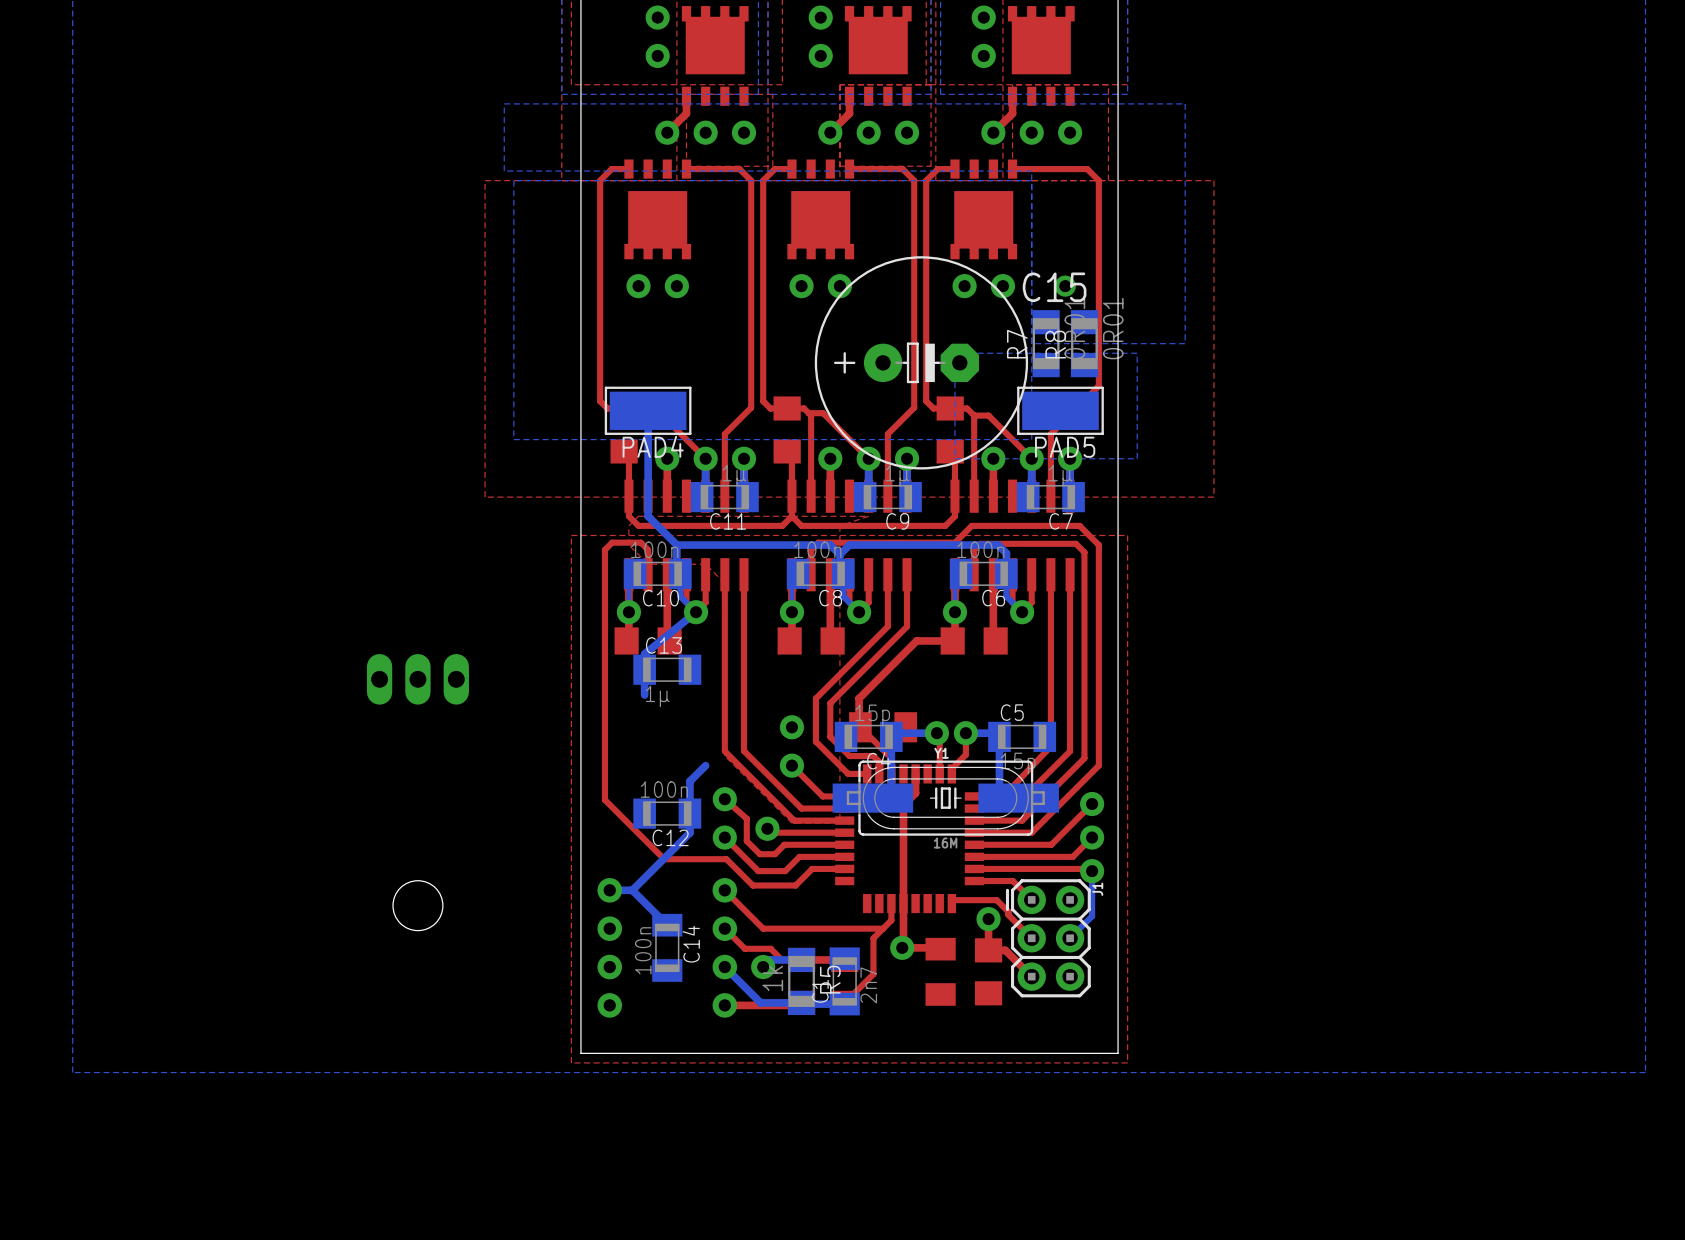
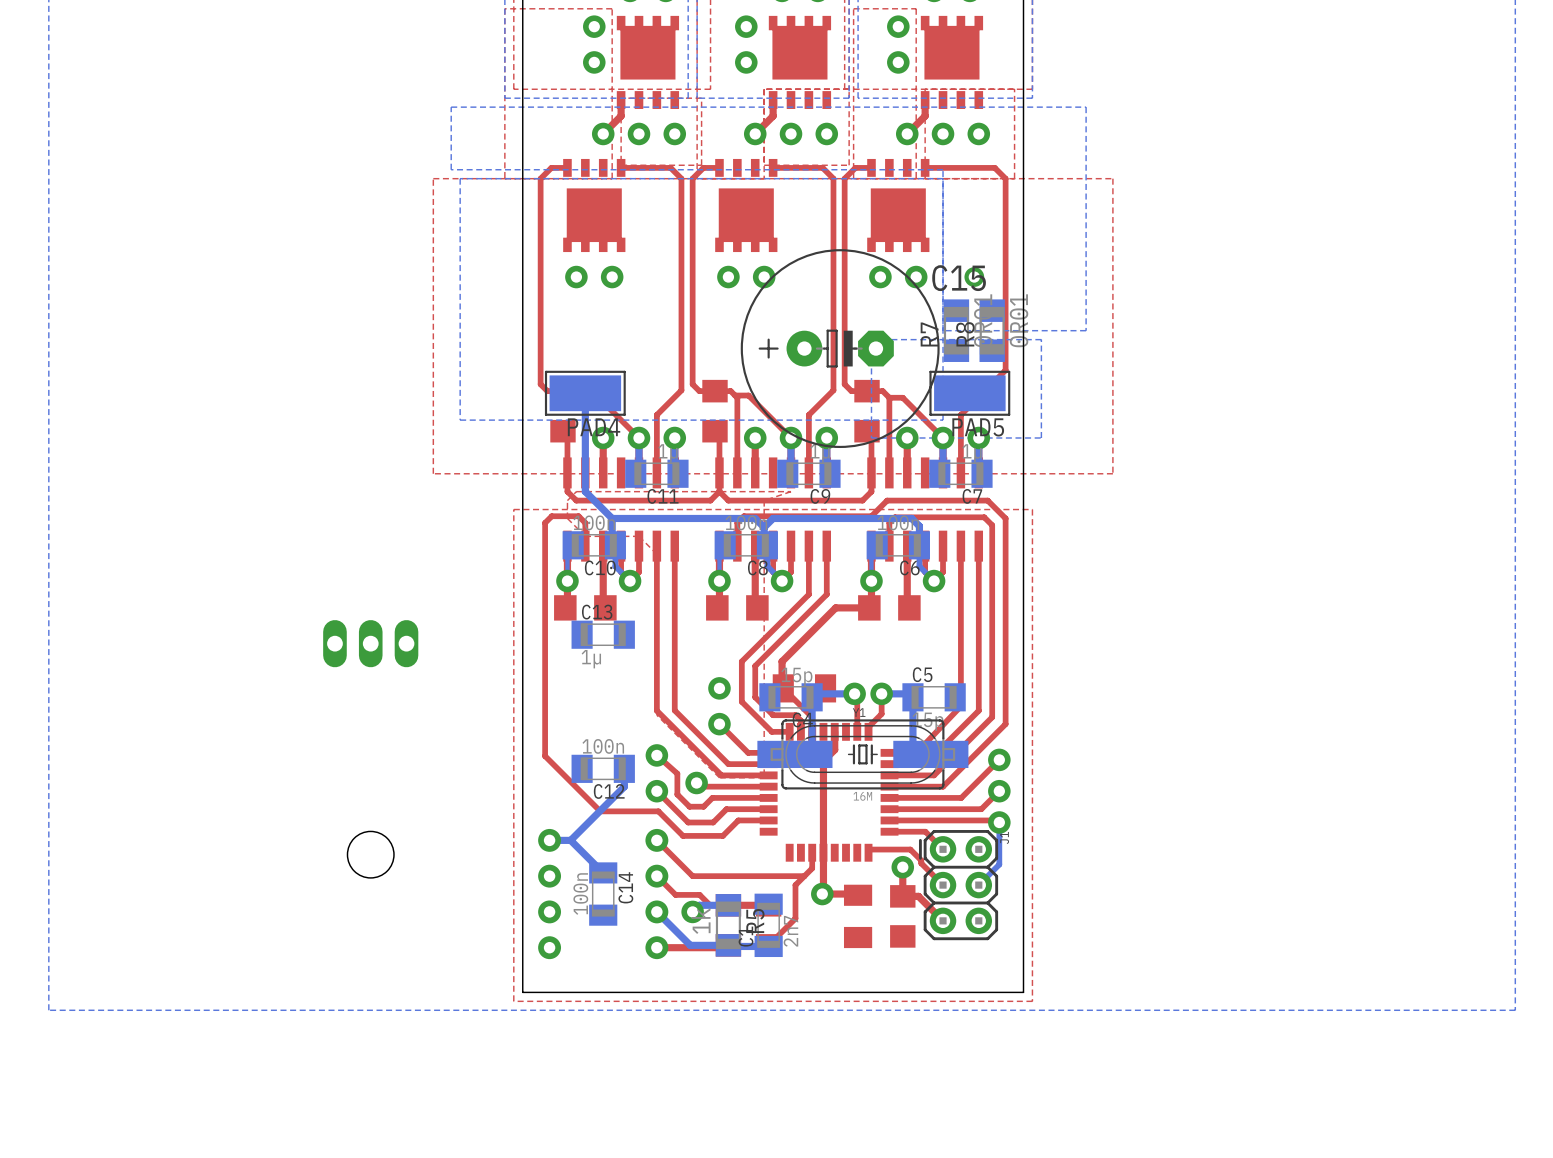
bottom track: (696, 612) (644, 654) (644, 695) -> none
bottom track: (705, 765) (689, 781) (689, 813) -> none

